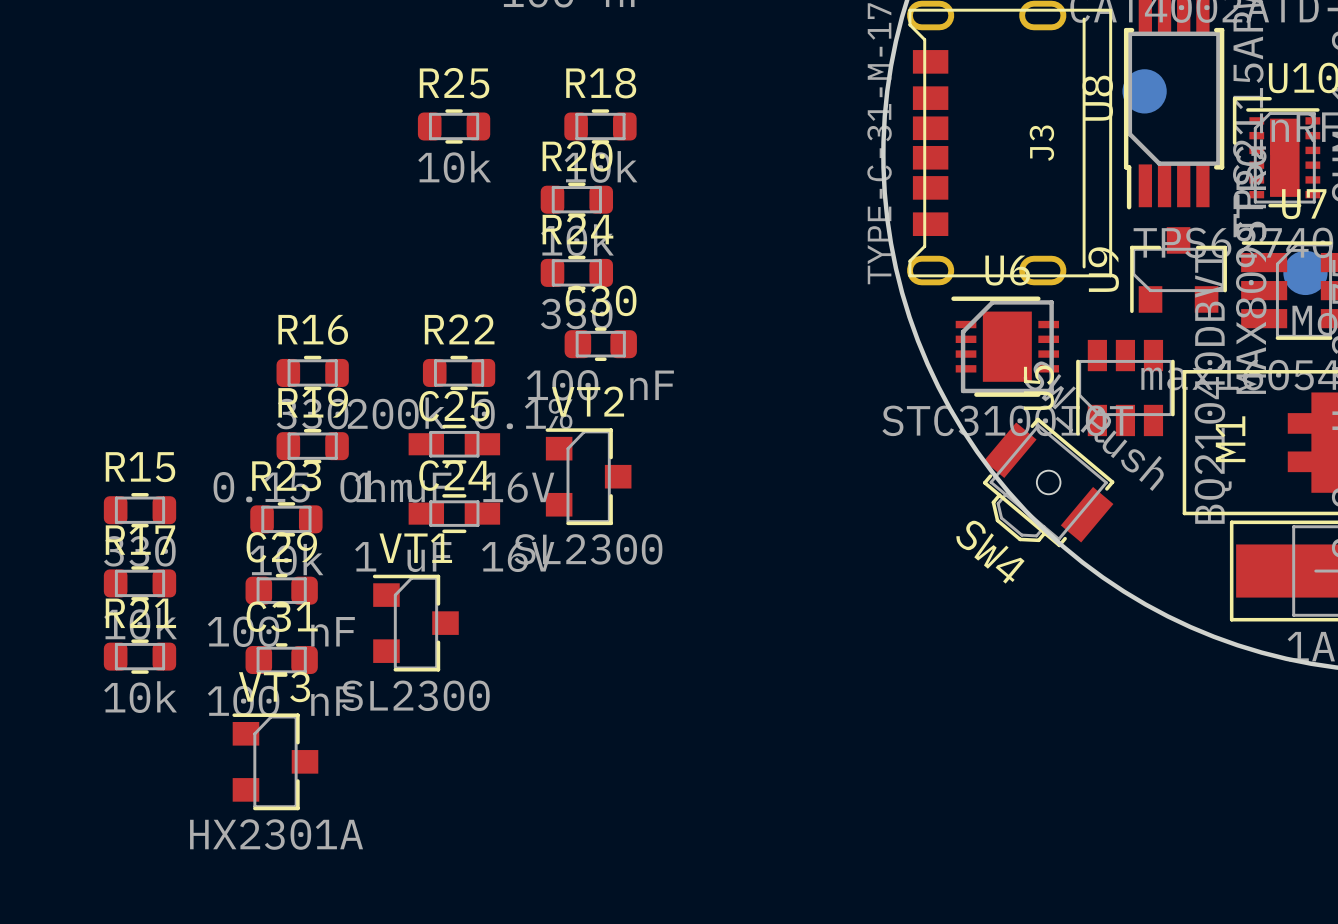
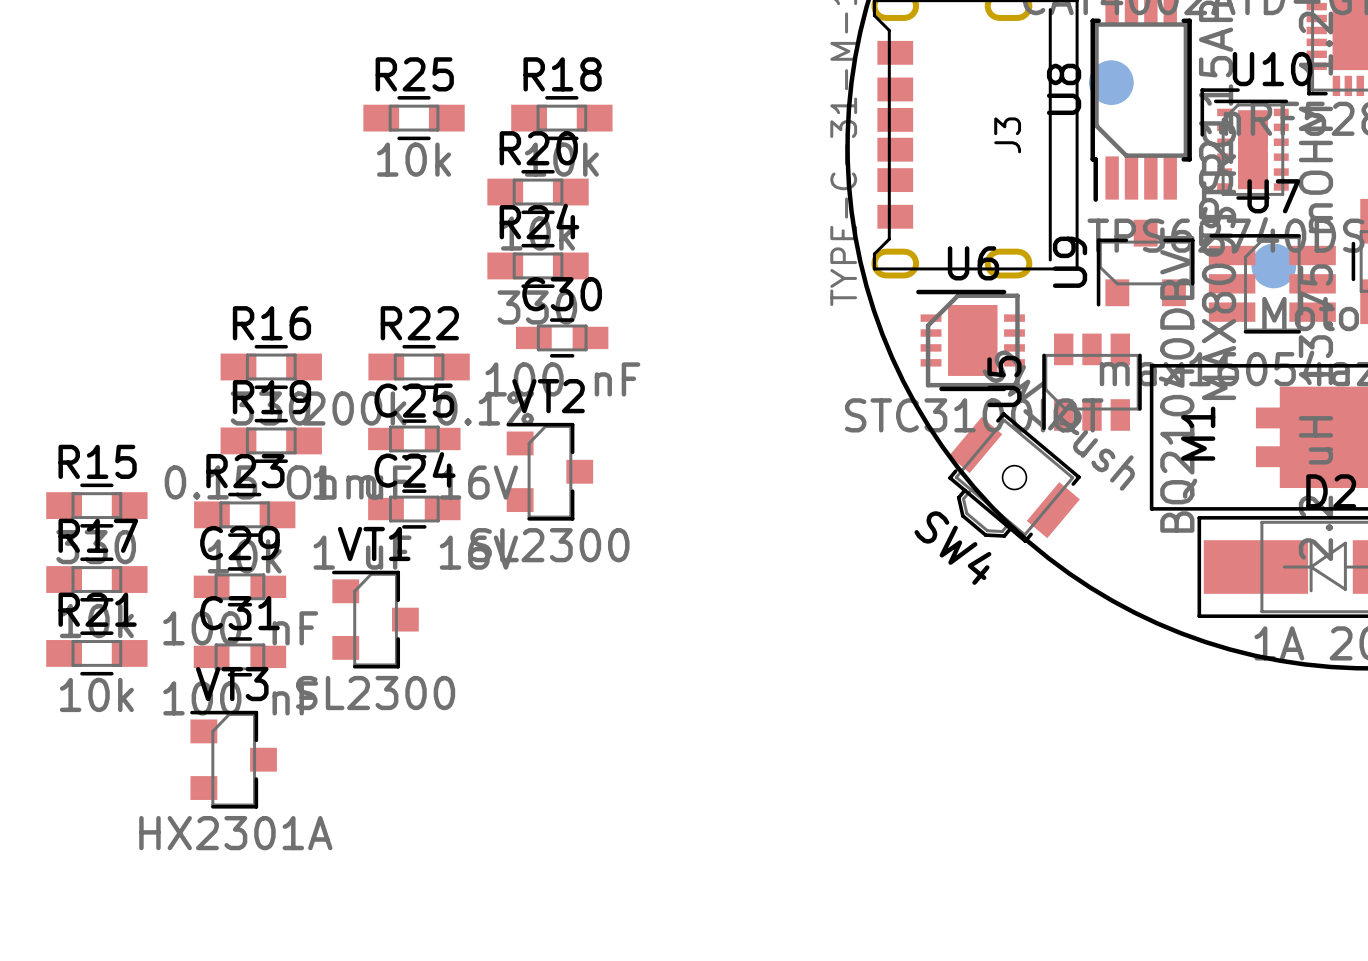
R25 footprint: [417, 109, 491, 144] -> [363, 96, 465, 141]
R18 footprint: [564, 109, 637, 144] -> [511, 96, 613, 141]
R20 footprint: [540, 182, 614, 217] -> [487, 169, 589, 215]
R24 footprint: [540, 255, 614, 291] -> [487, 243, 589, 289]
C30 footprint: [564, 327, 637, 362] -> [515, 318, 609, 358]
R16 footprint: [276, 355, 349, 391] -> [220, 344, 322, 390]
R22 footprint: [422, 355, 496, 391] -> [368, 344, 470, 390]
R19 footprint: [276, 428, 349, 464] -> [220, 418, 322, 463]
R15 footprint: [103, 493, 177, 528] -> [46, 483, 148, 528]
R23 footprint: [250, 502, 323, 537] -> [194, 492, 296, 537]
R17 footprint: [103, 566, 177, 601] -> [46, 557, 148, 602]
C29 footprint: [245, 573, 318, 608] -> [193, 567, 287, 607]
R21 footprint: [103, 639, 177, 674] -> [46, 631, 148, 676]
C31 footprint: [245, 643, 318, 677] -> [193, 637, 287, 677]

